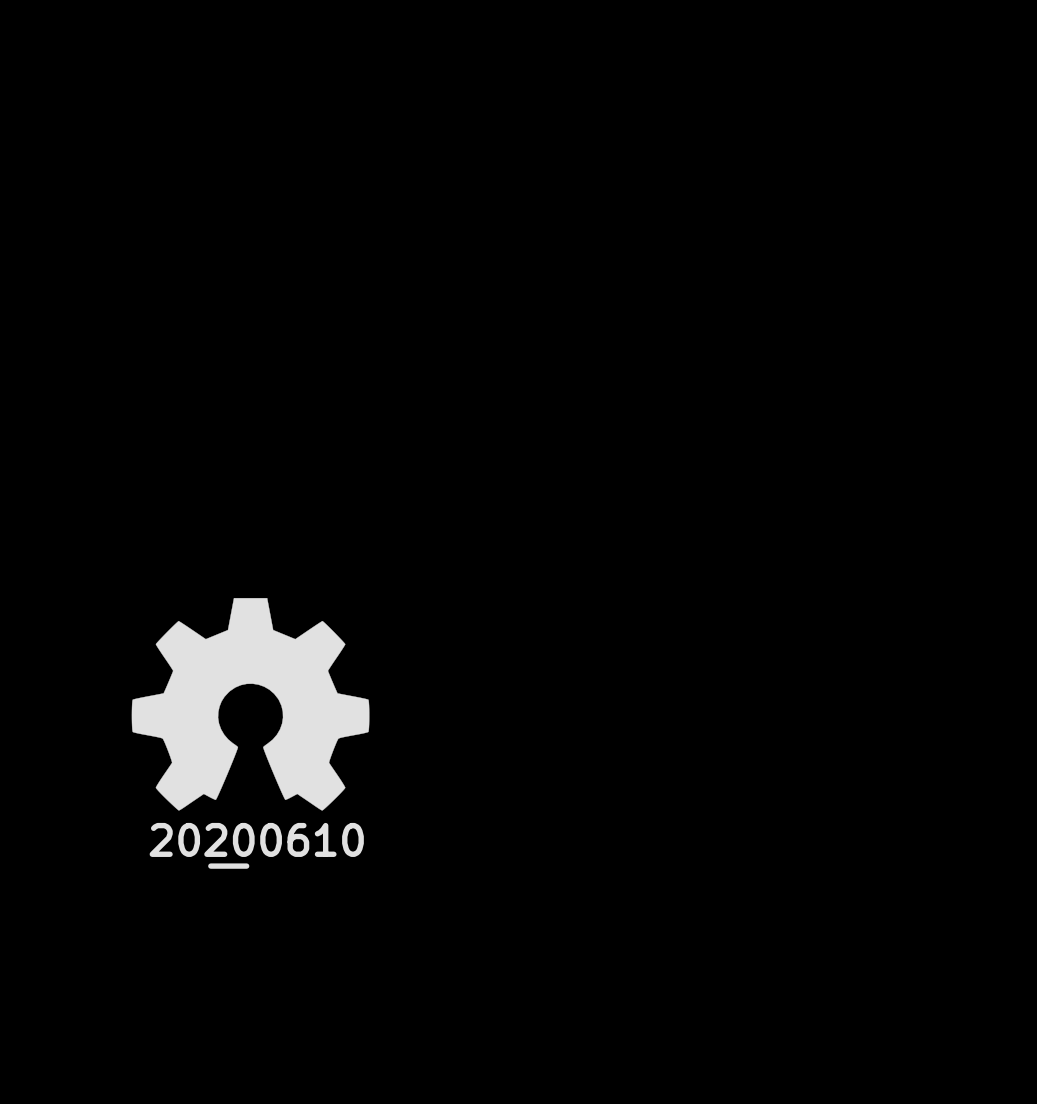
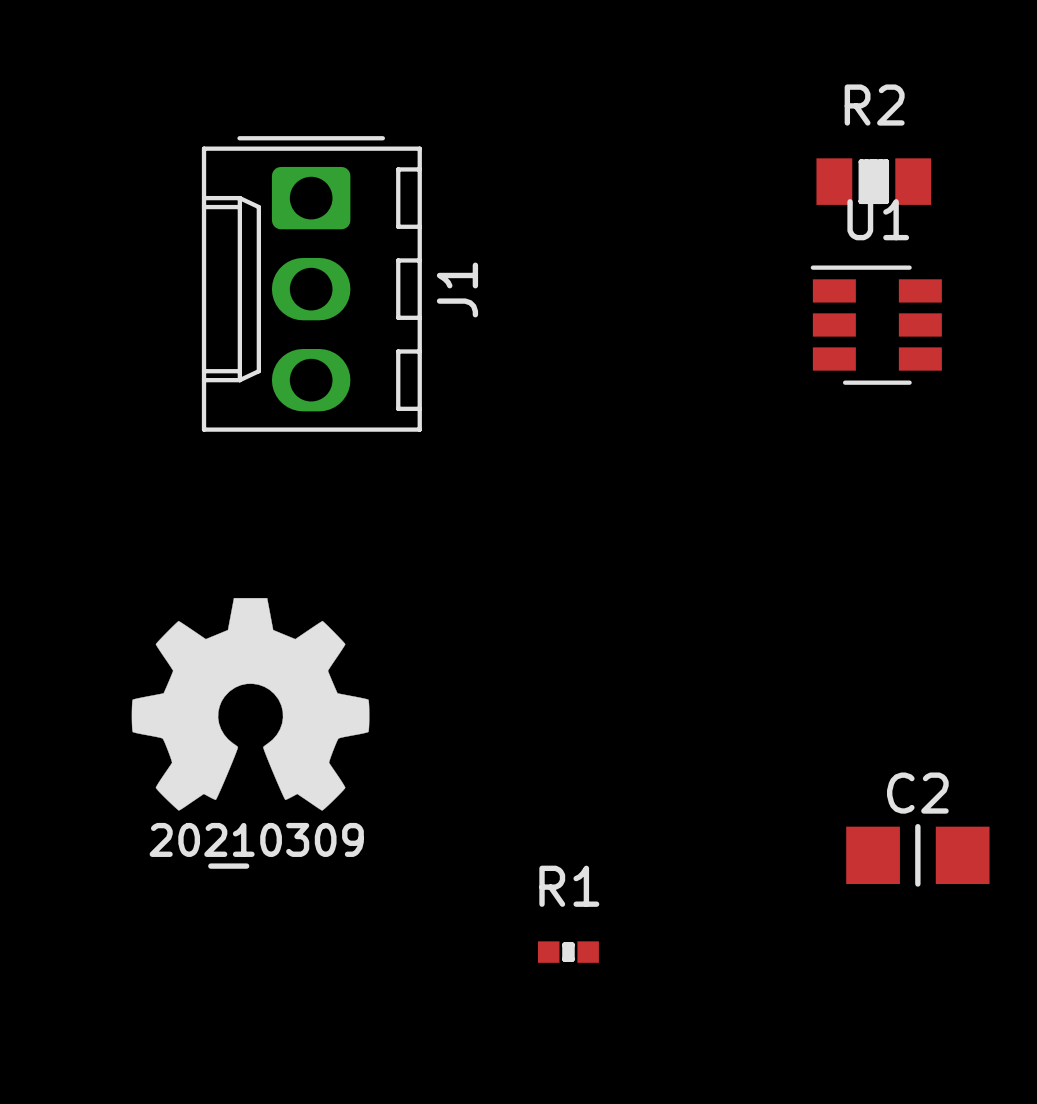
R2: none -> (873, 181)
J1: none -> (311, 283)
U1: none -> (876, 325)
drawing shape: [149, 822, 364, 869] -> [149, 822, 364, 869]
C2: none -> (917, 855)
R1: none -> (568, 952)

